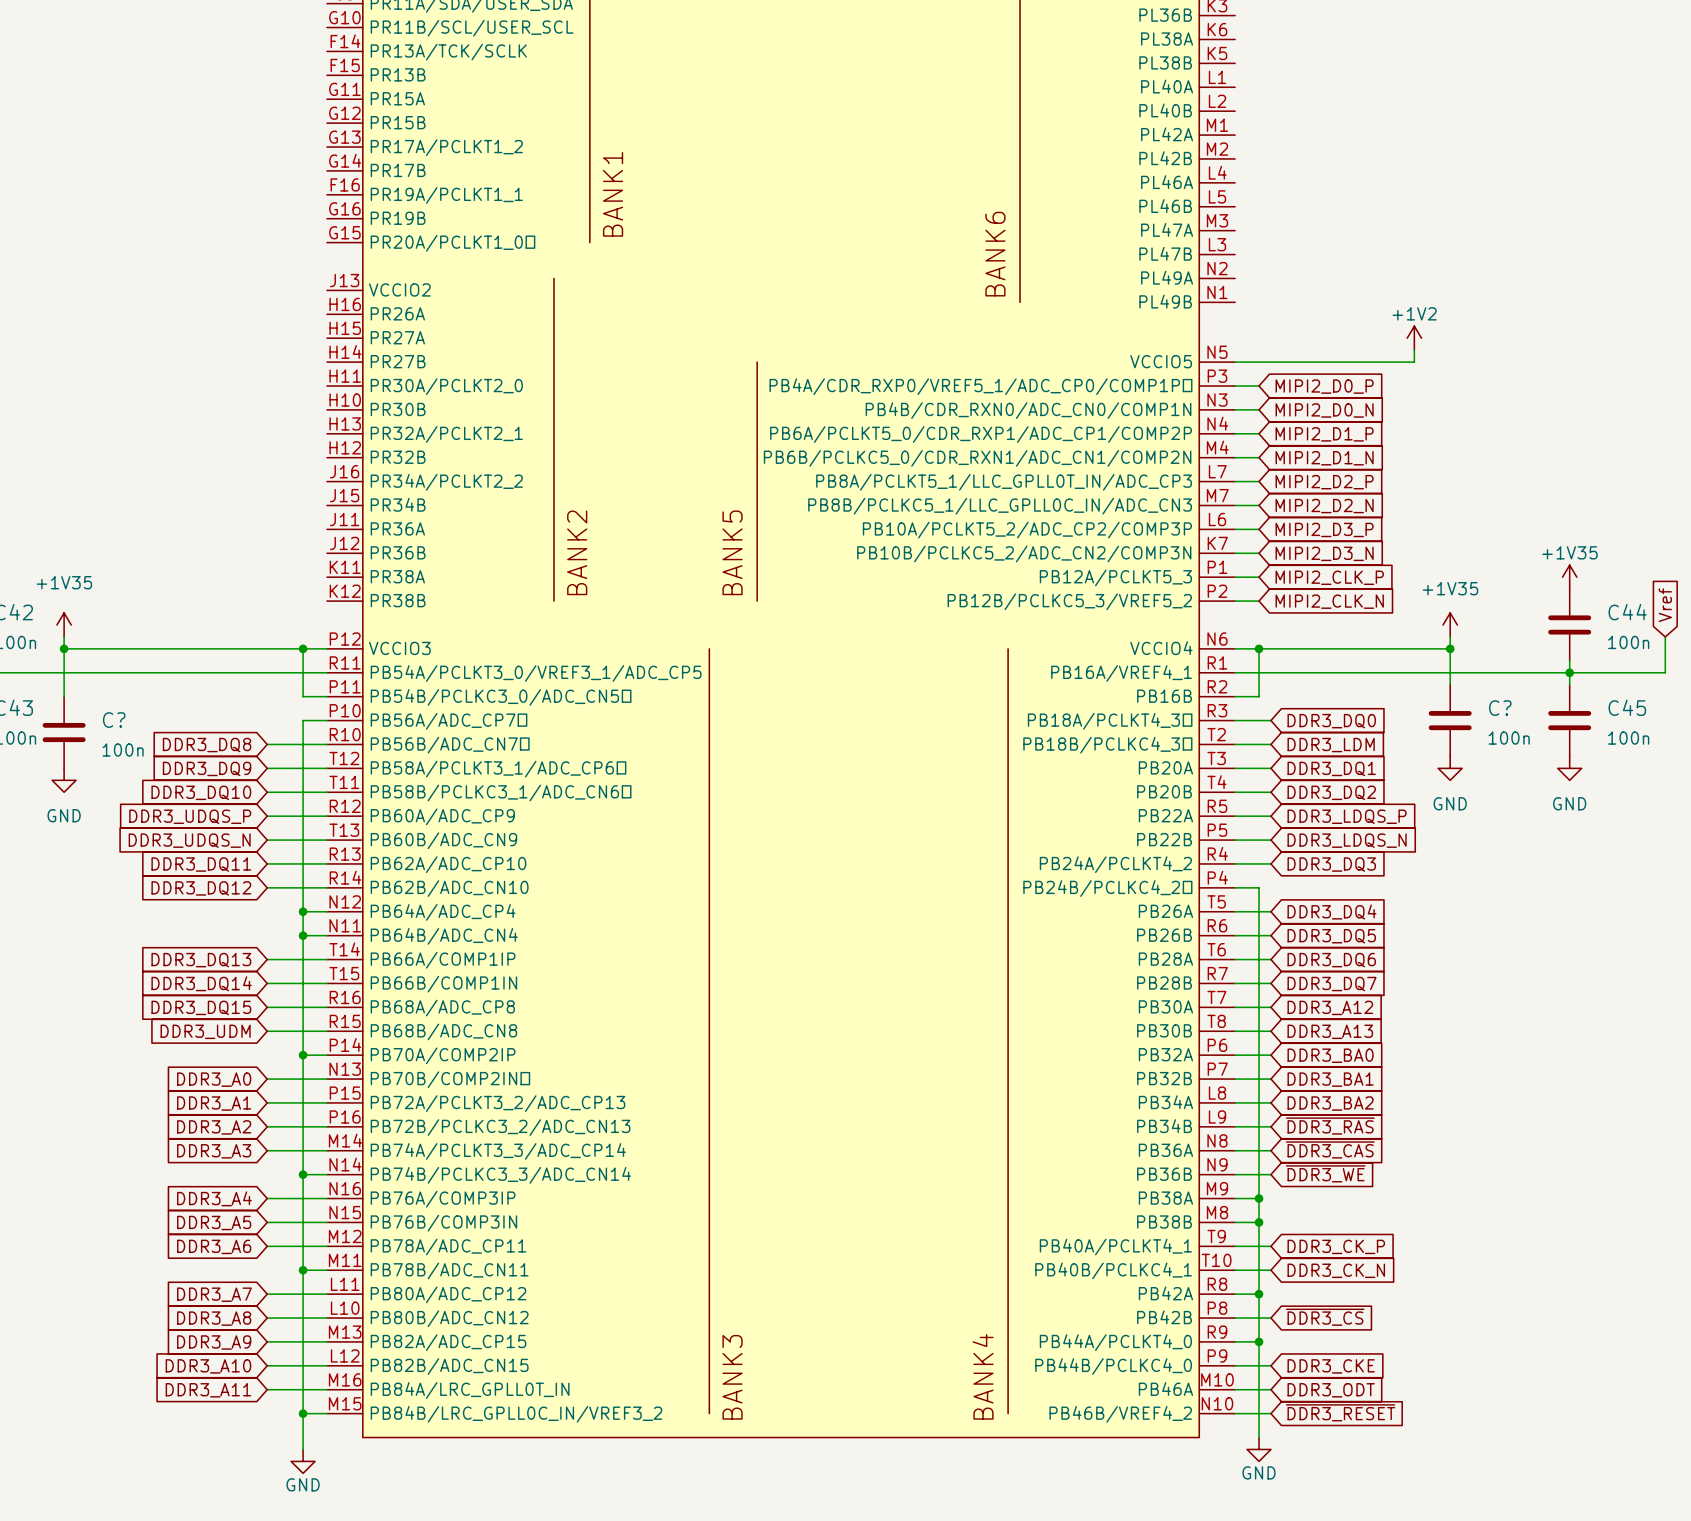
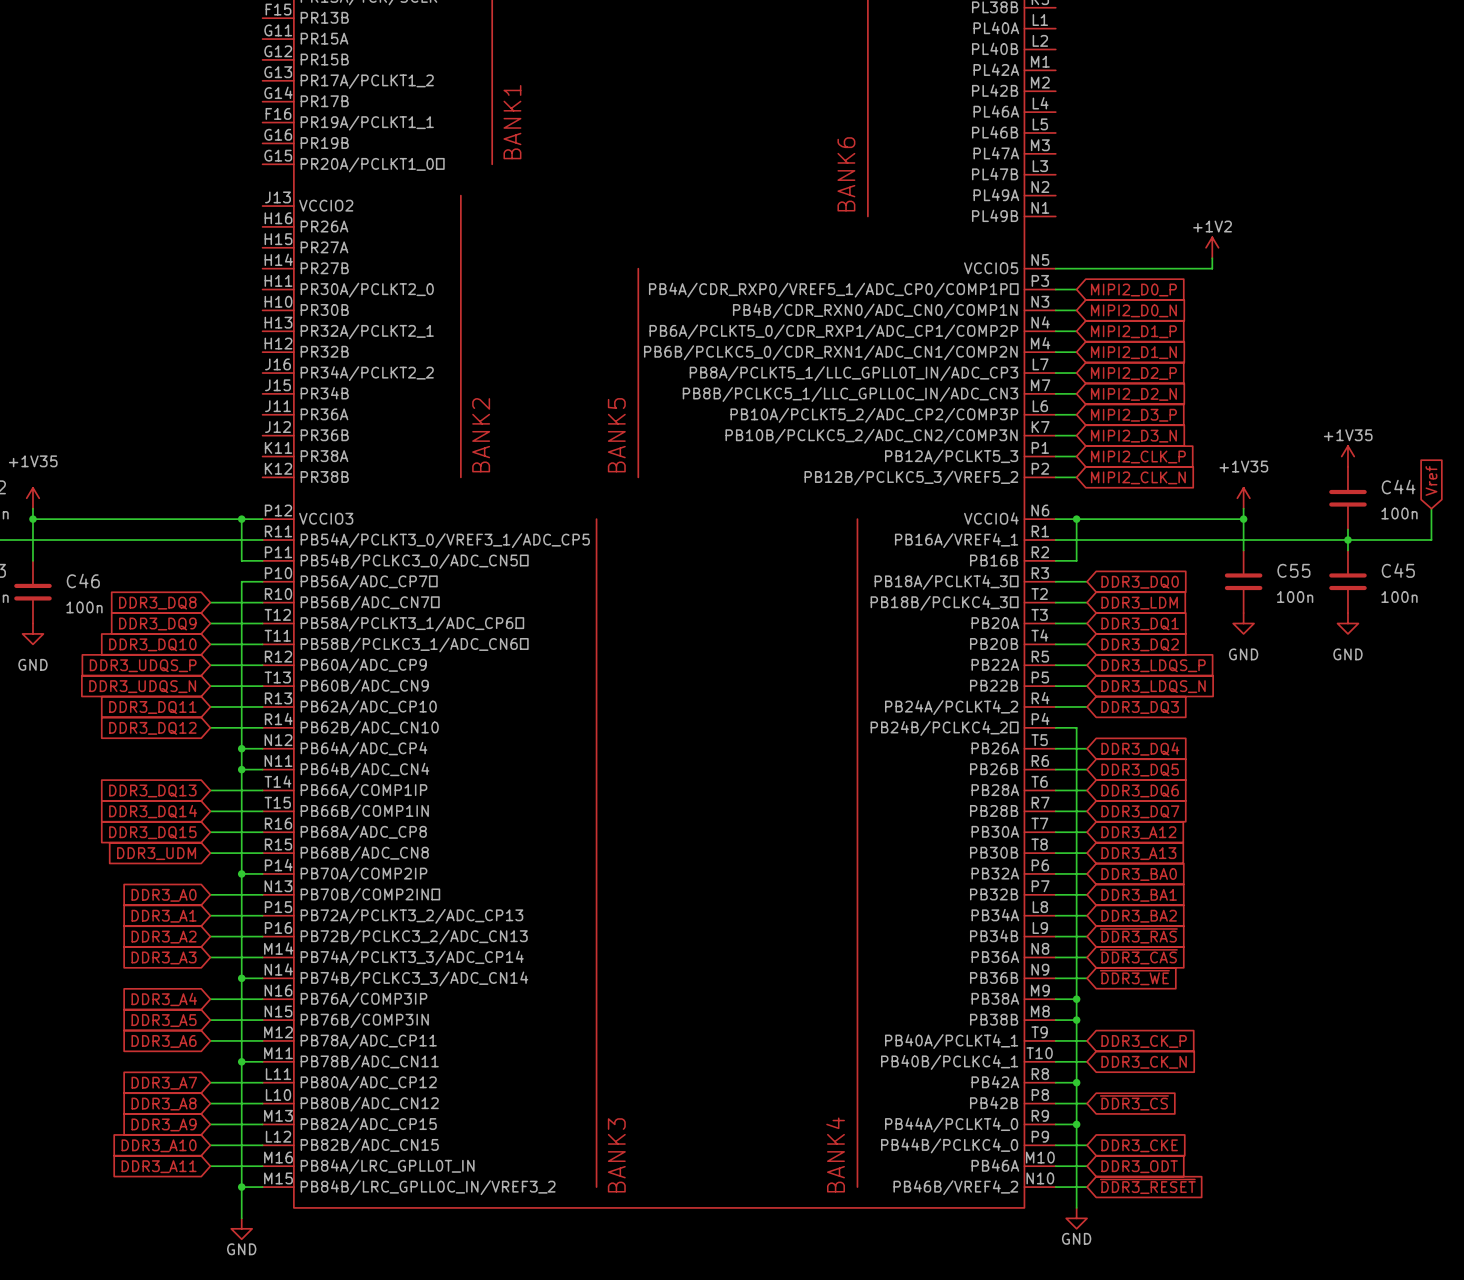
C? name: C? (1500, 708) -> C55 (1293, 570)
C? name: C? (114, 720) -> C46 (83, 580)

